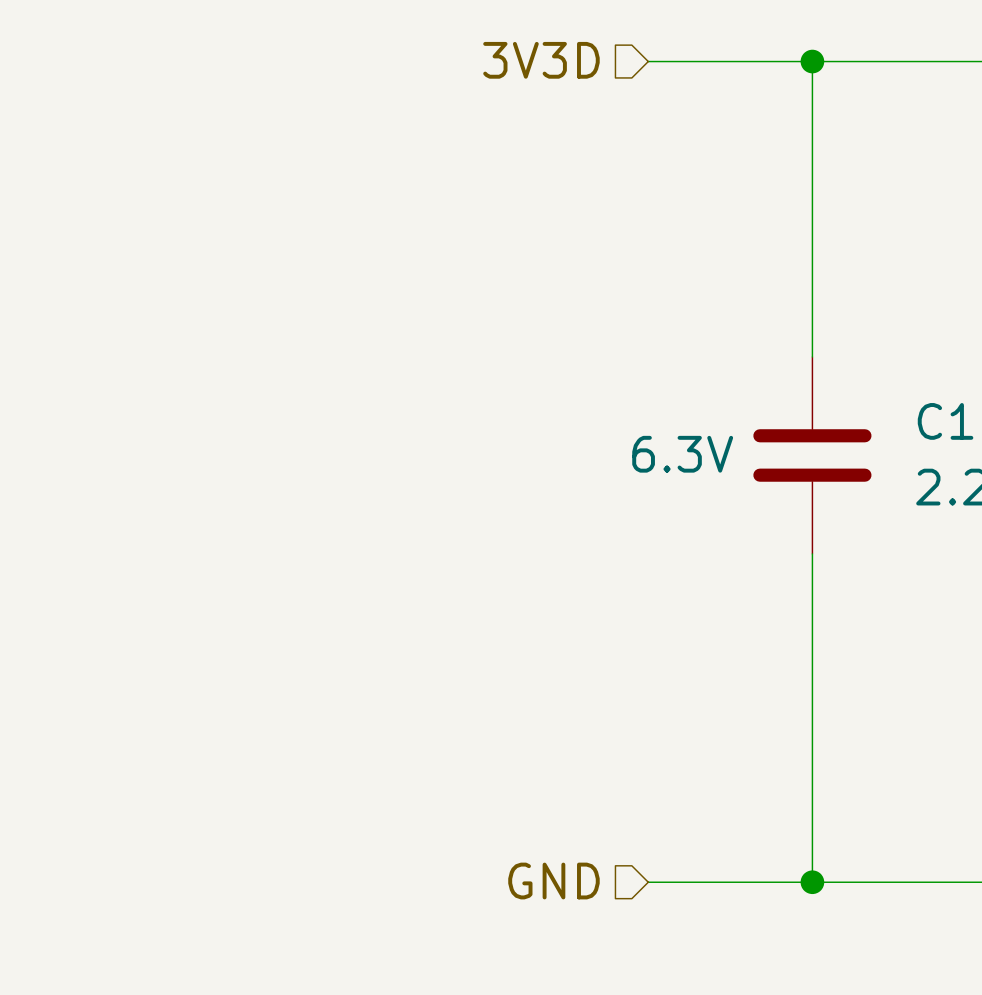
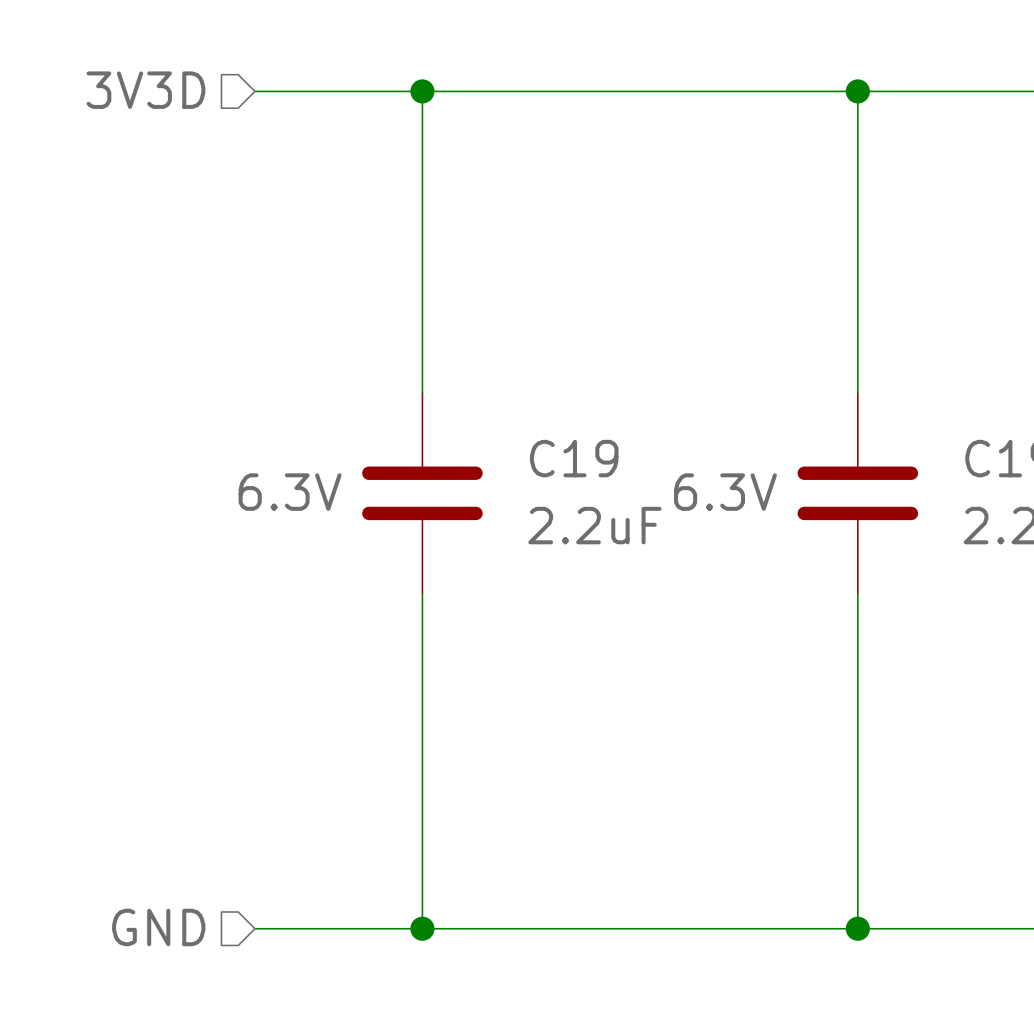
hierarchical label position: 3V3D (541, 60) -> 3V3D (145, 90)
wire: none -> (254, 91) (690, 91)
wire: none -> (422, 91) (422, 392)
junction: none -> (422, 91)
C19: none -> 2.2uF (422, 493)
wire: none -> (422, 593) (422, 928)
hierarchical label position: GND (553, 881) -> GND (158, 927)
wire: none -> (254, 928) (690, 928)
junction: none -> (422, 928)

